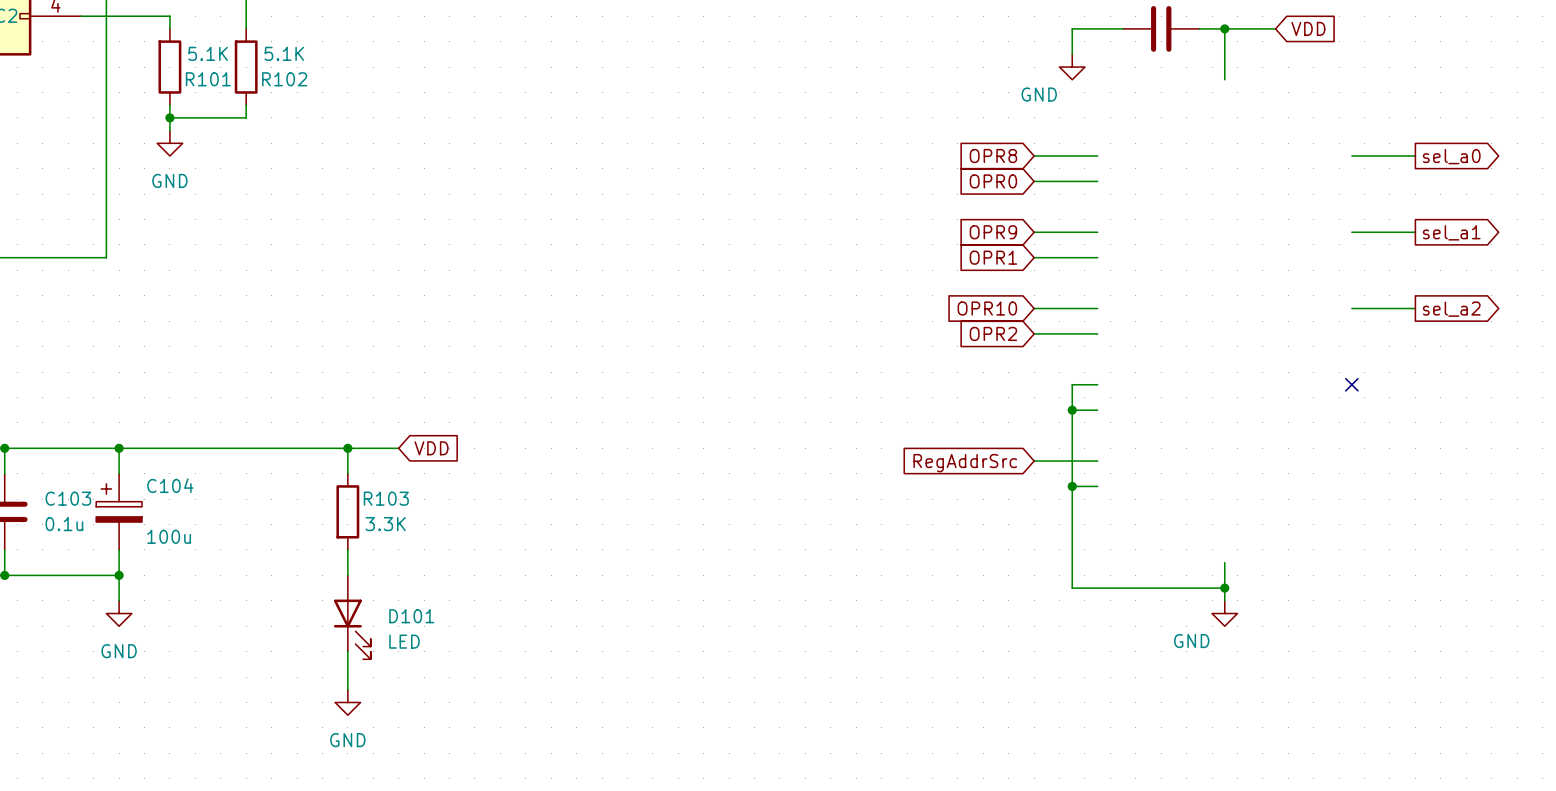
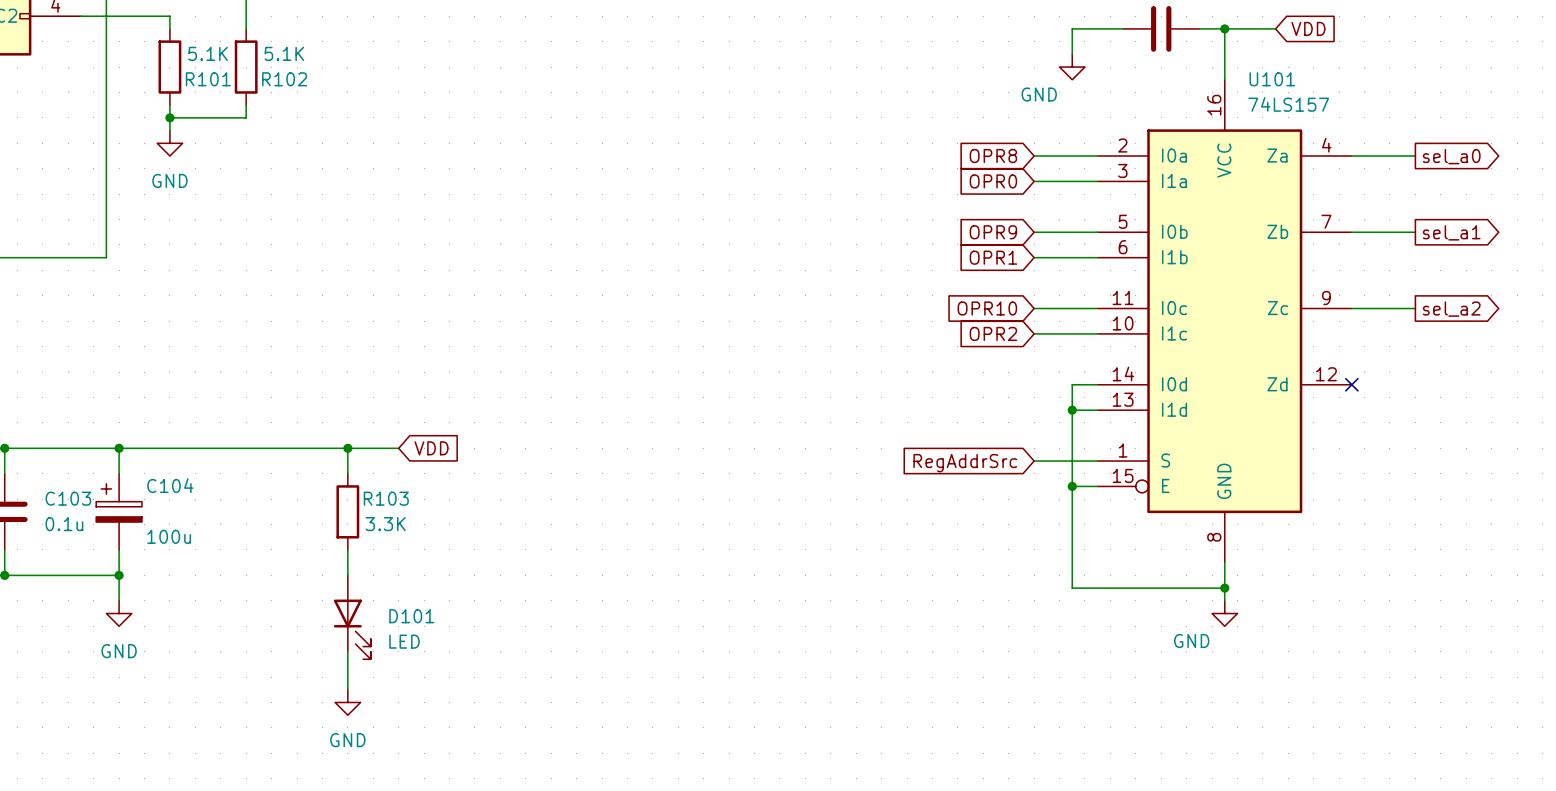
U101: none -> 74LS157 (1224, 321)

